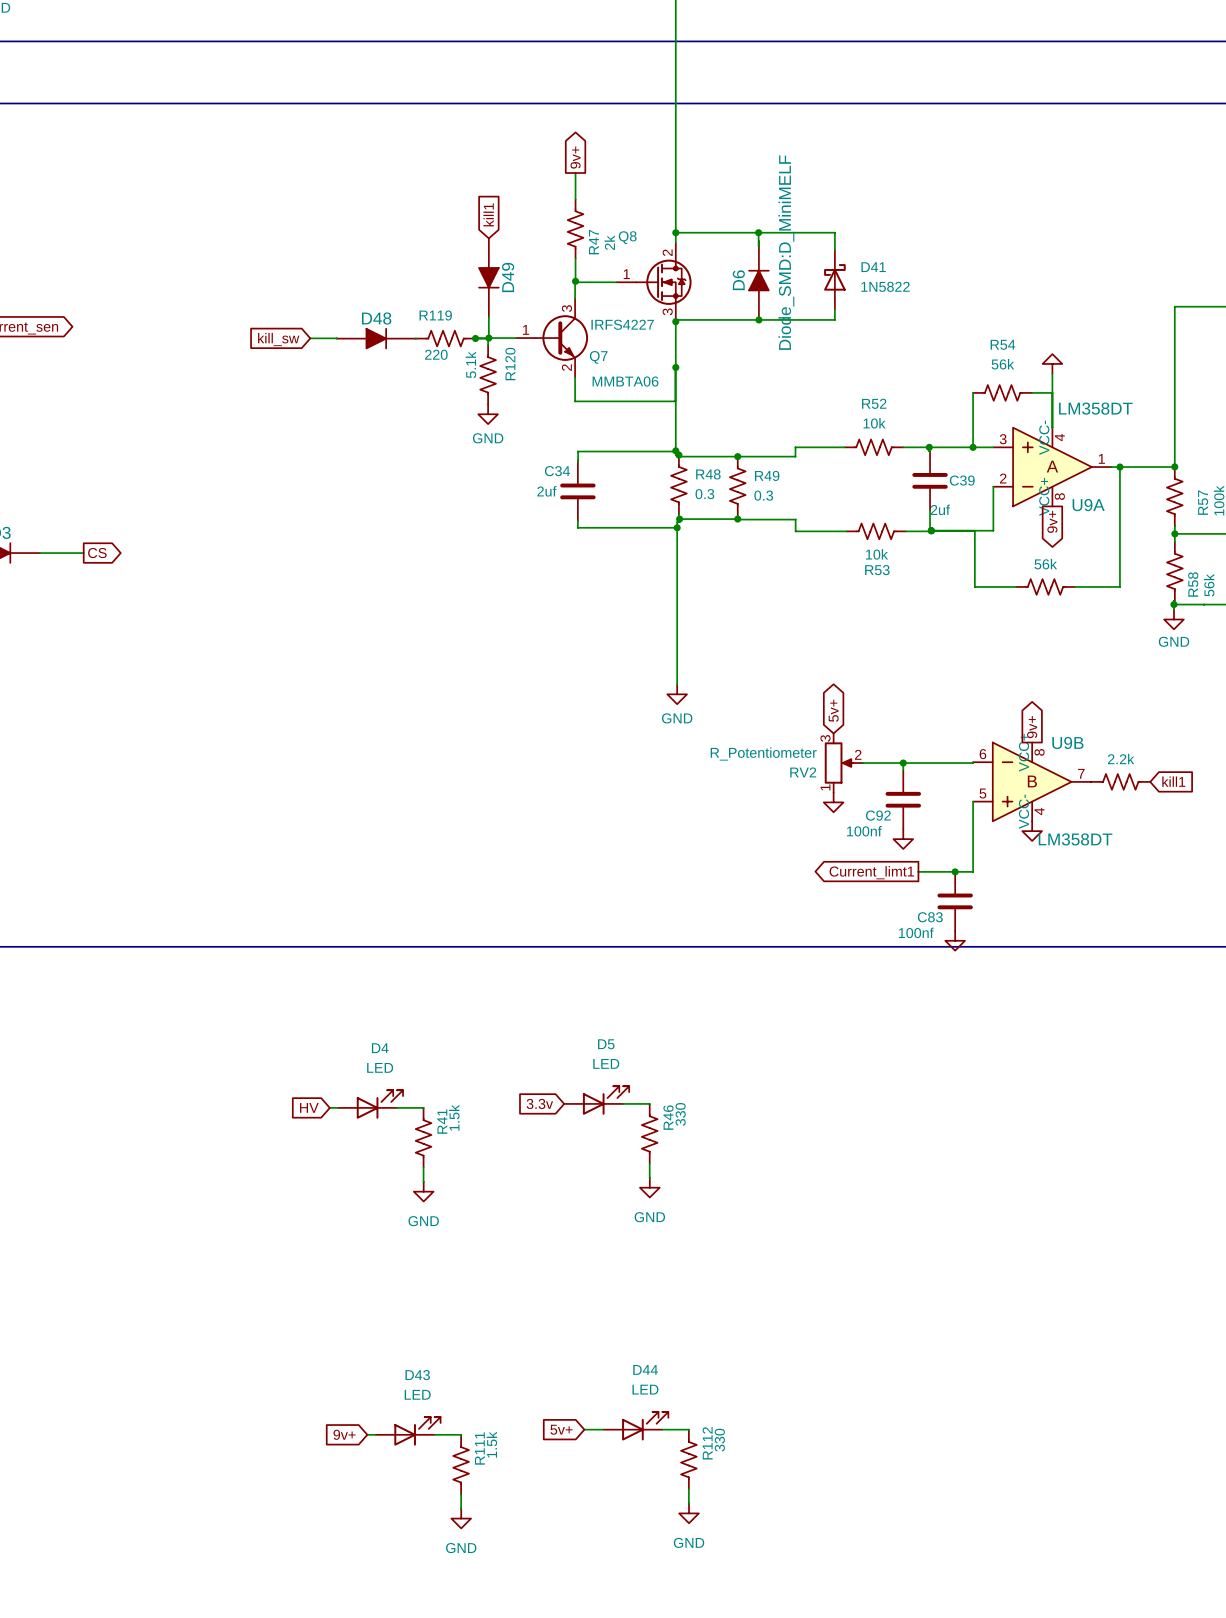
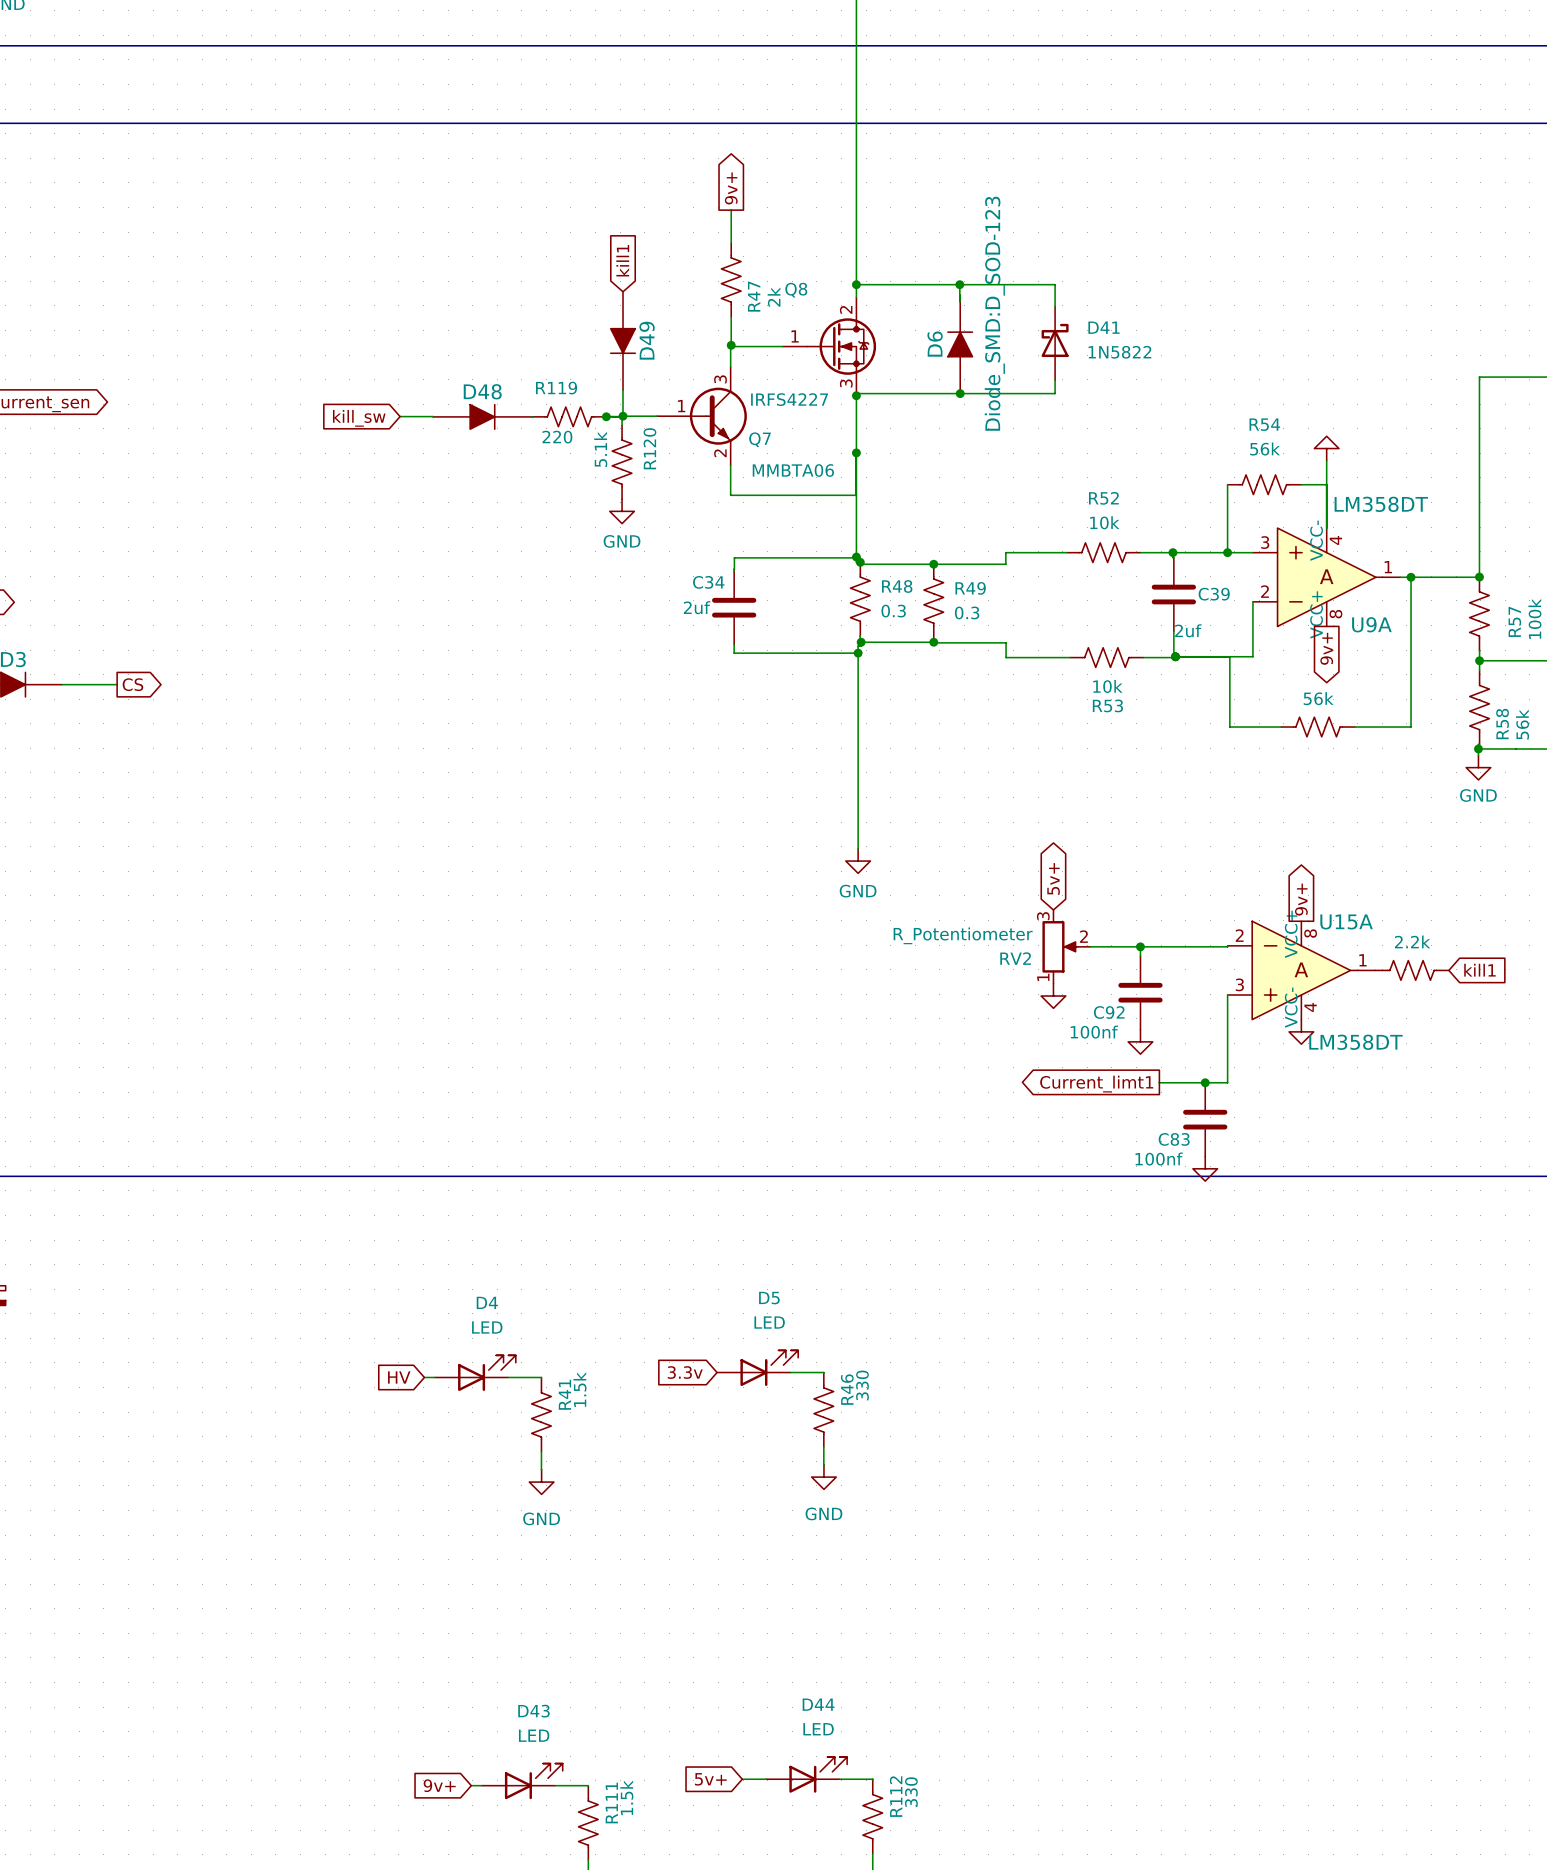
D6 text: Diode_SMD:D_MiniMELF (786, 252) -> Diode_SMD:D_SOD-123 (994, 313)
Q7 symbol: [516, 298, 589, 378] -> [656, 367, 747, 466]
U9B name: U9B (1067, 742) -> U15A (1346, 921)
U9B pin number: 6 (982, 754) -> 2 (1239, 935)
U9B pin number: 7 (1081, 773) -> 1 (1362, 960)
U9B text: B (1032, 781) -> A (1301, 969)
U9B pin number: 5 (982, 793) -> 3 (1239, 984)

